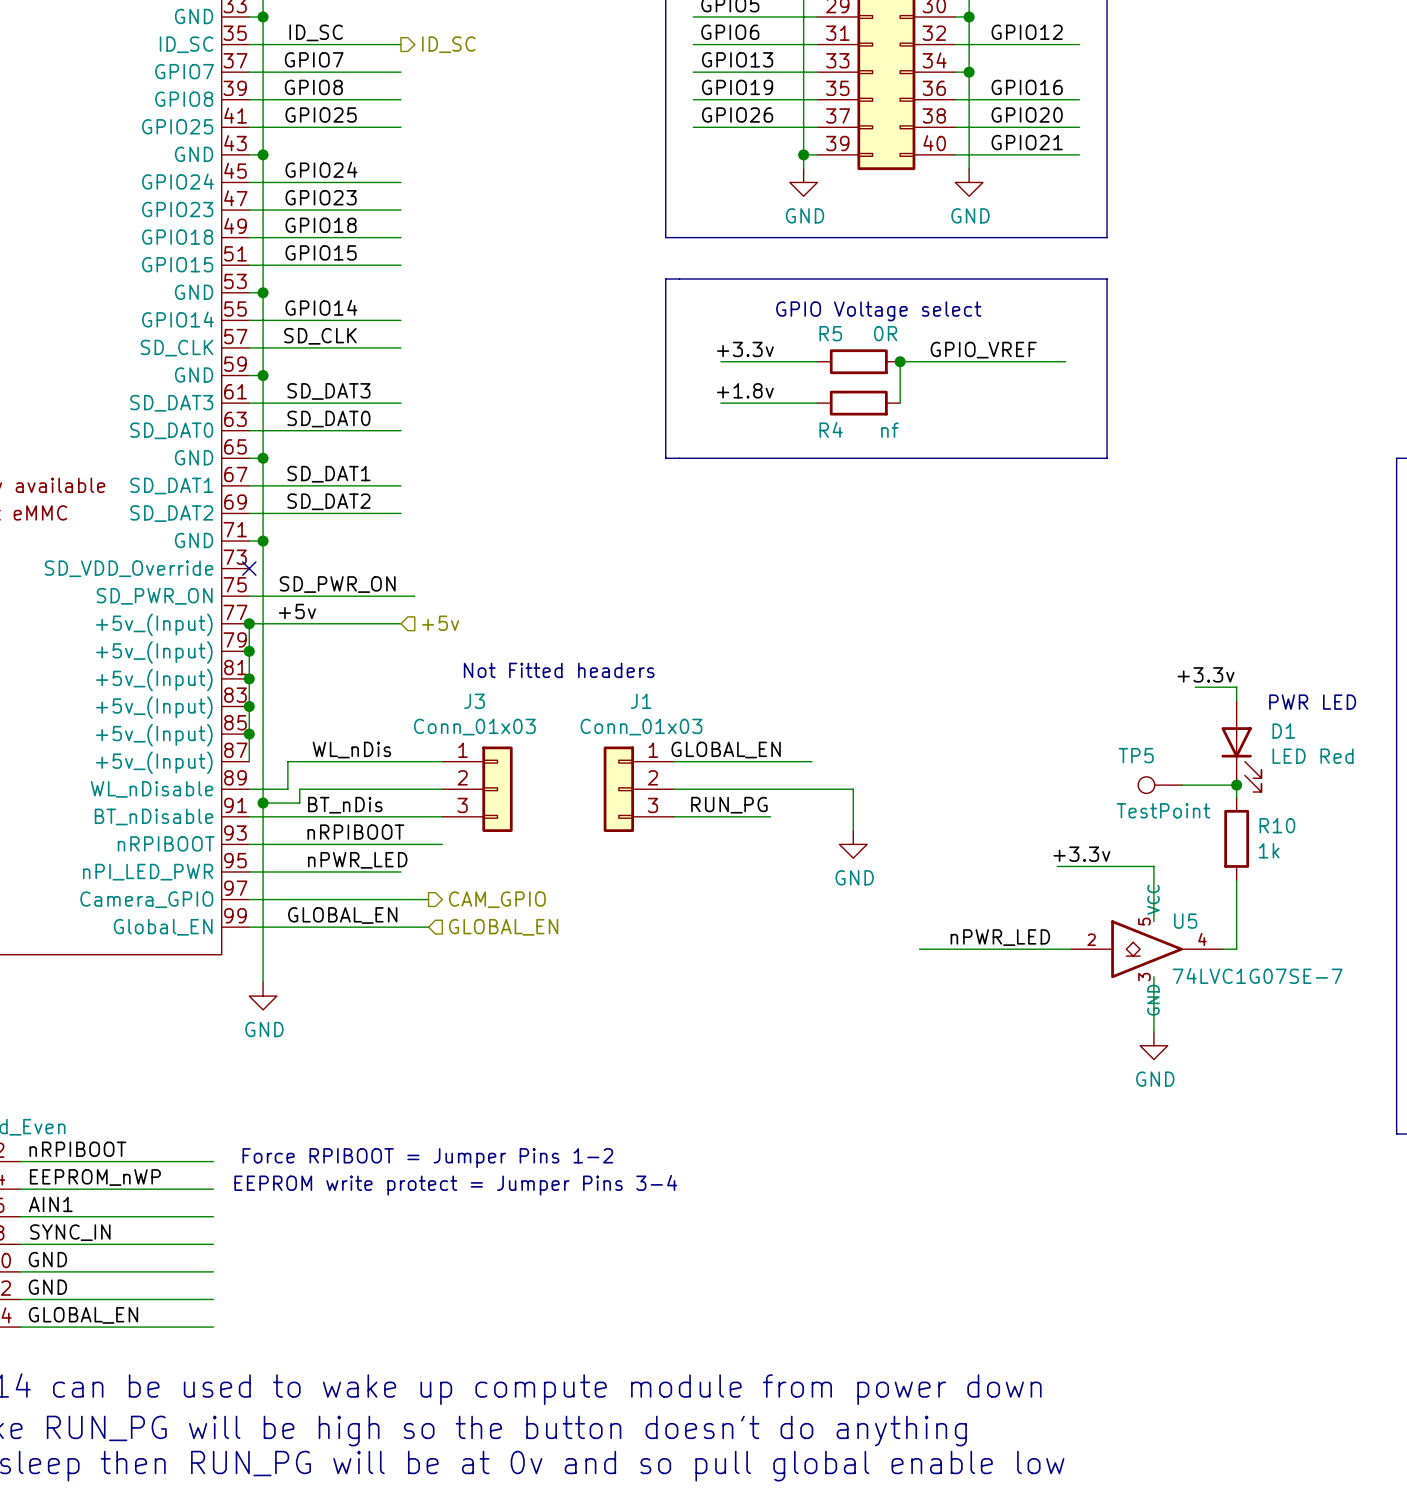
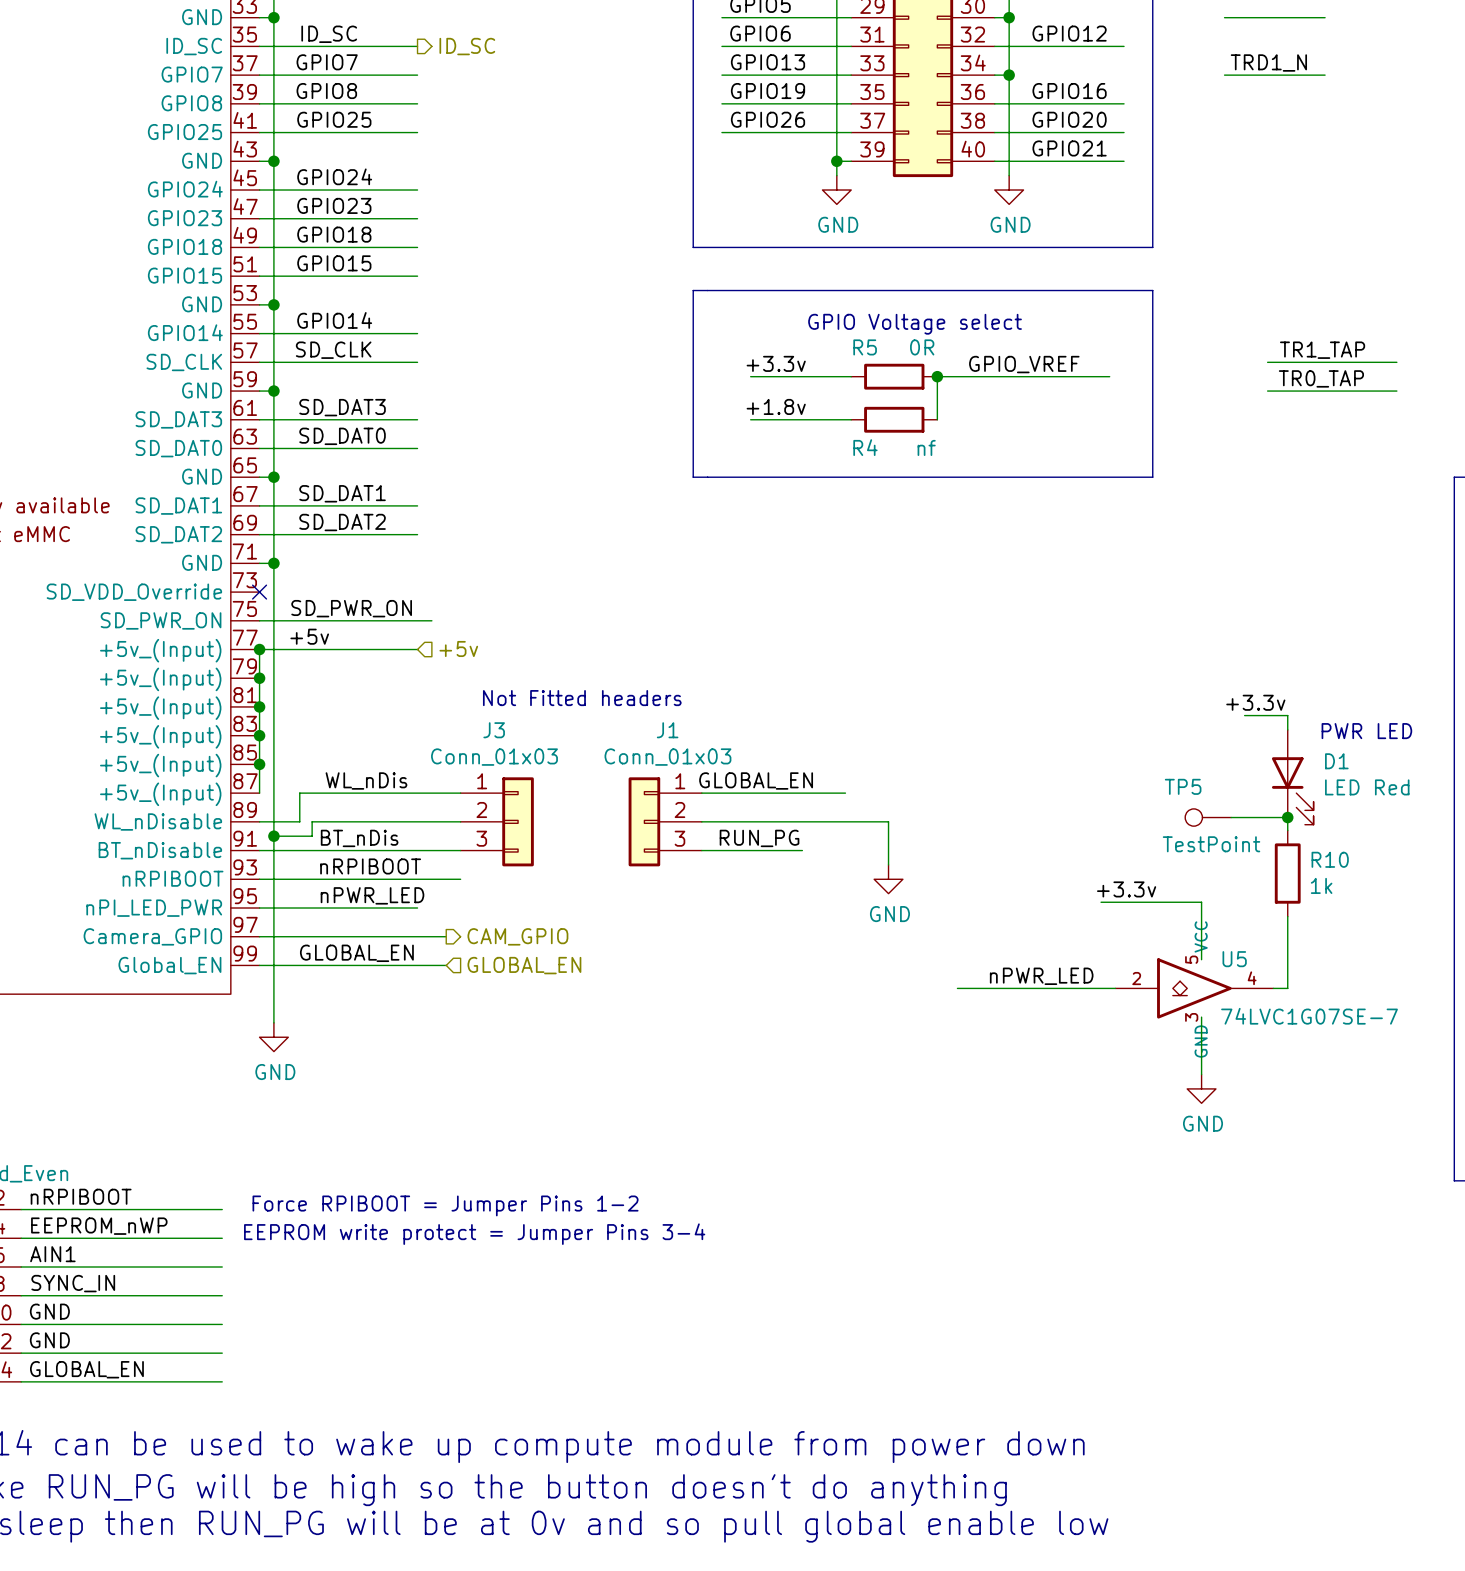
wire: none -> (1224, 17) (1325, 17)
label: none -> TRD1_N (1268, 62)
wire: none -> (1224, 75) (1325, 75)
label: none -> TR1_TAP (1322, 350)
wire: none -> (1267, 362) (1396, 362)
label: none -> TR0_TAP (1321, 378)
wire: none -> (1267, 391) (1396, 391)

